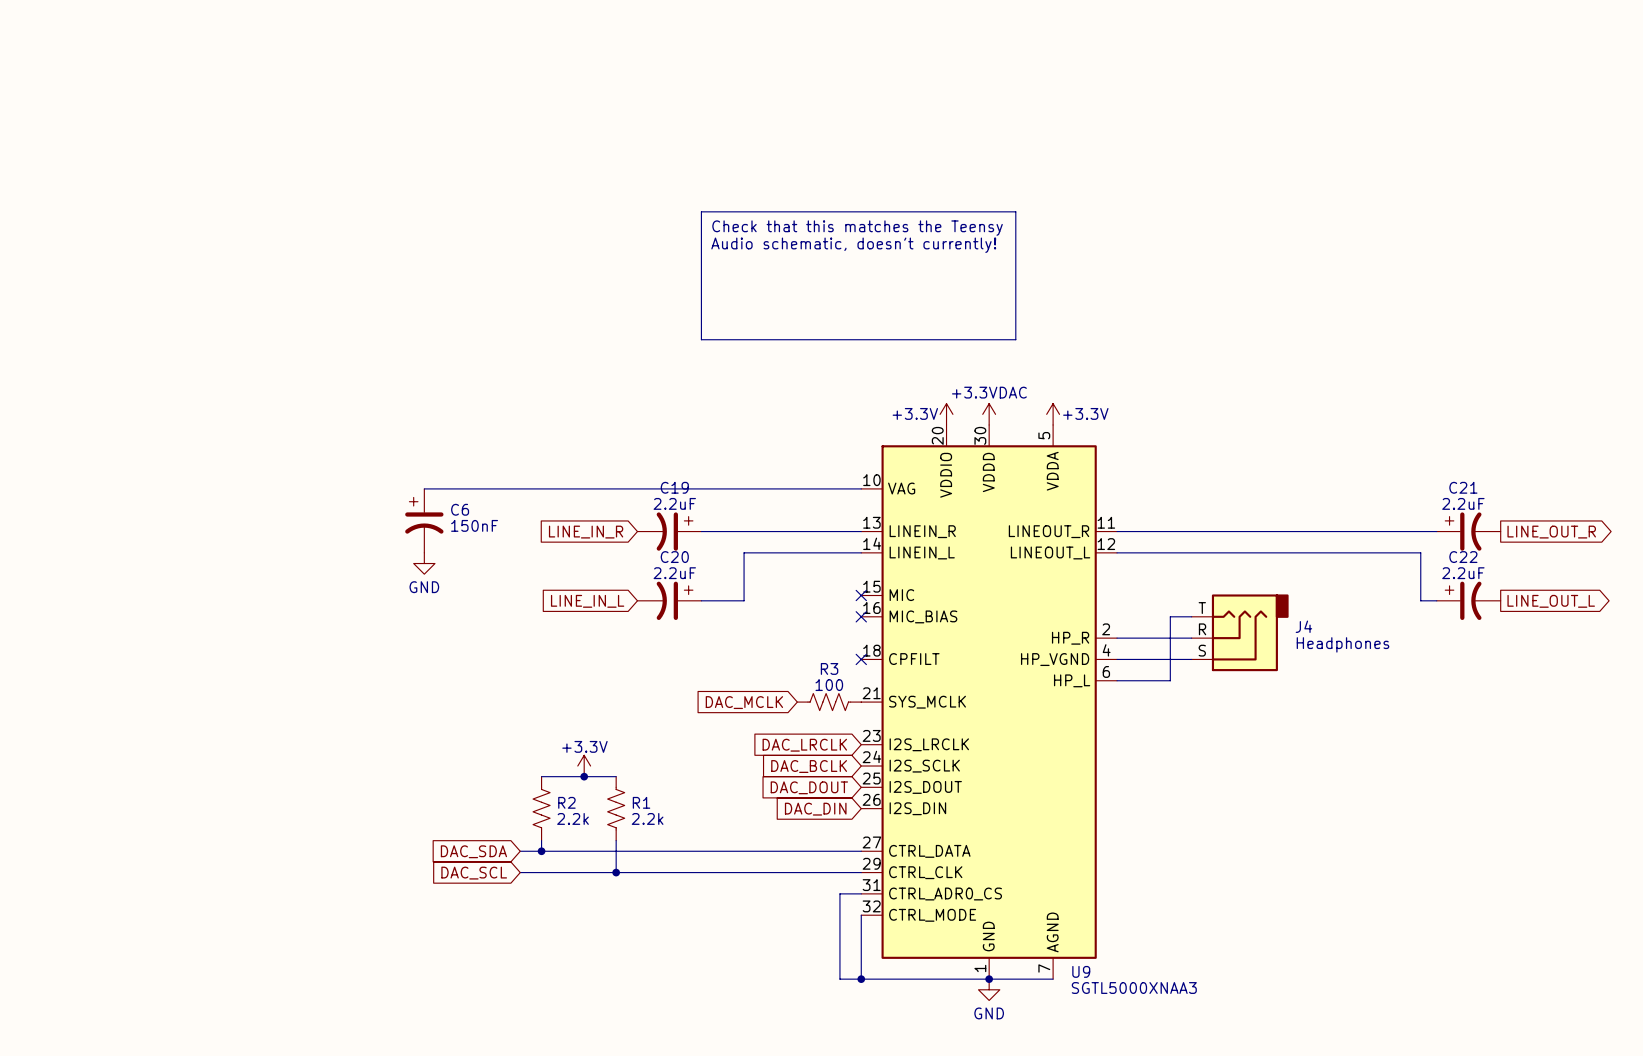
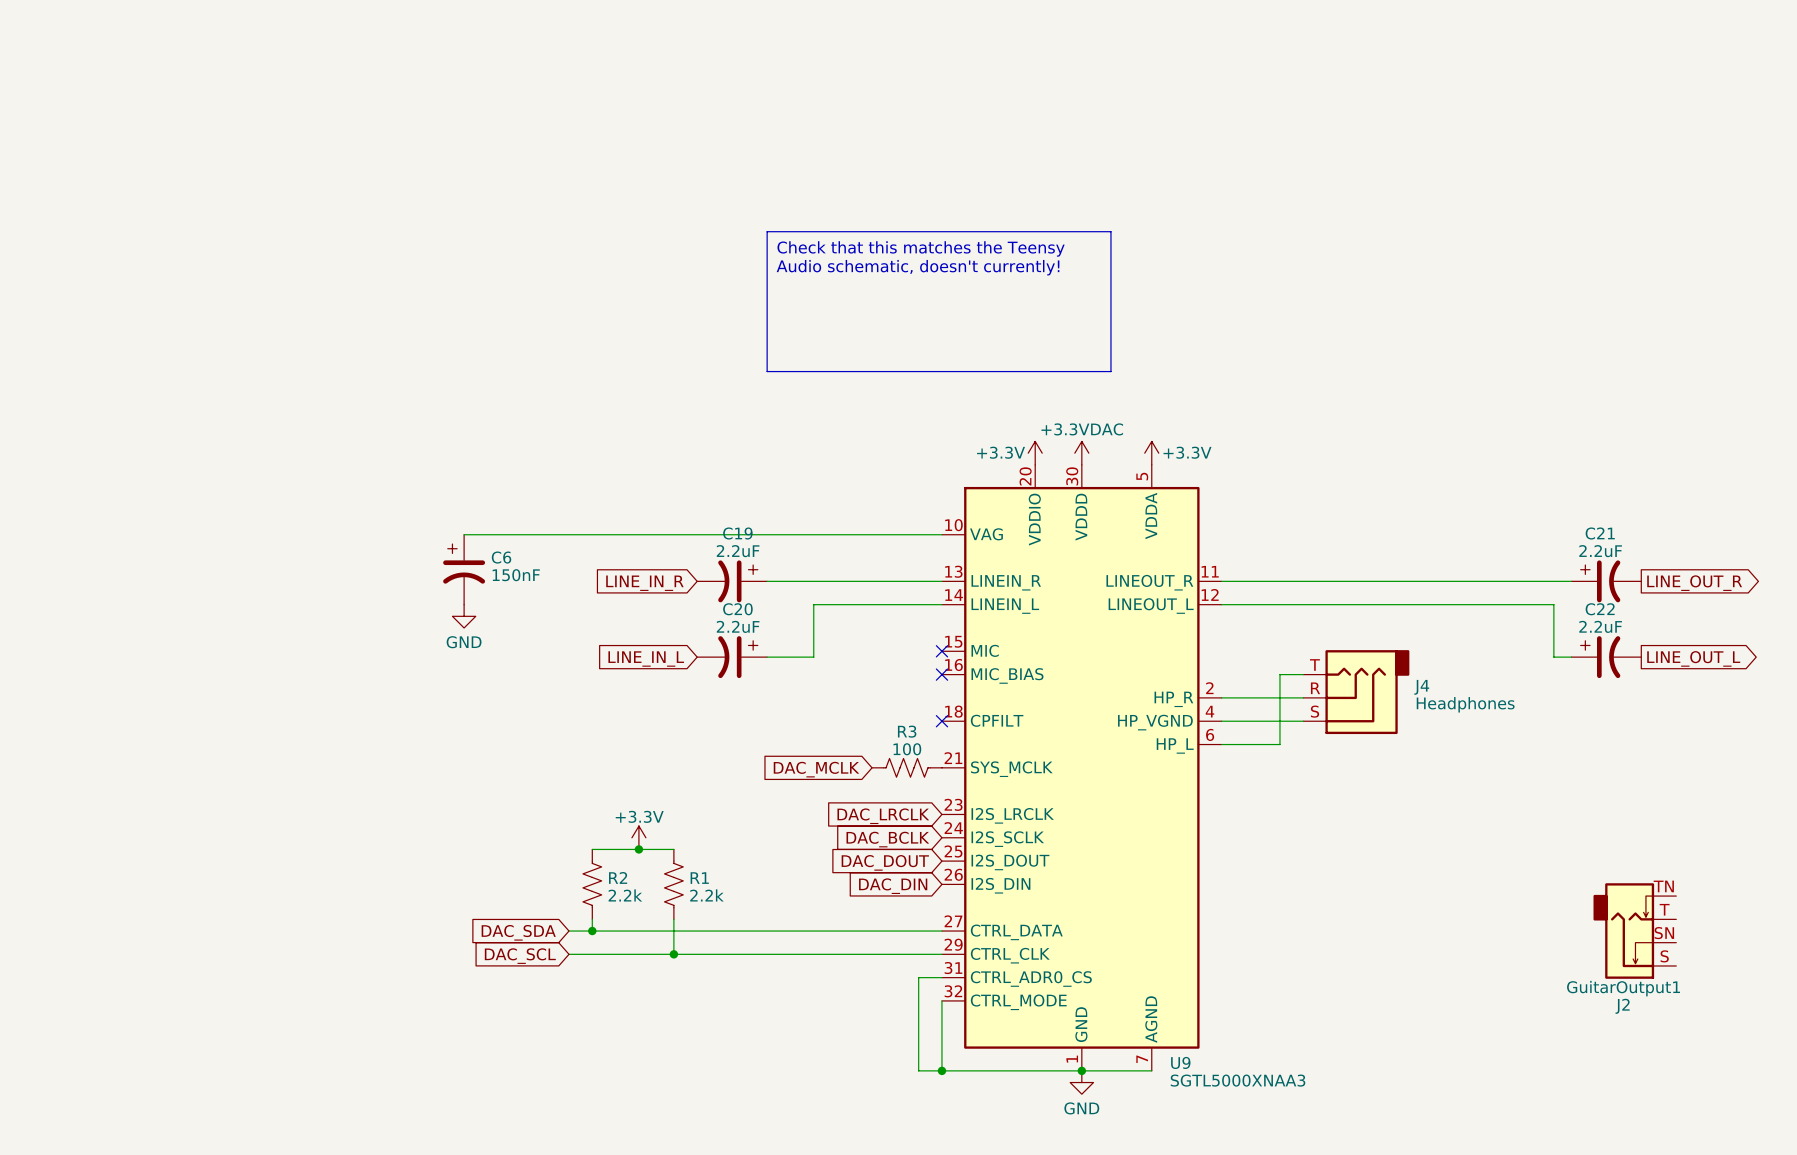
J2: none -> GuitarOutput1 (1634, 931)

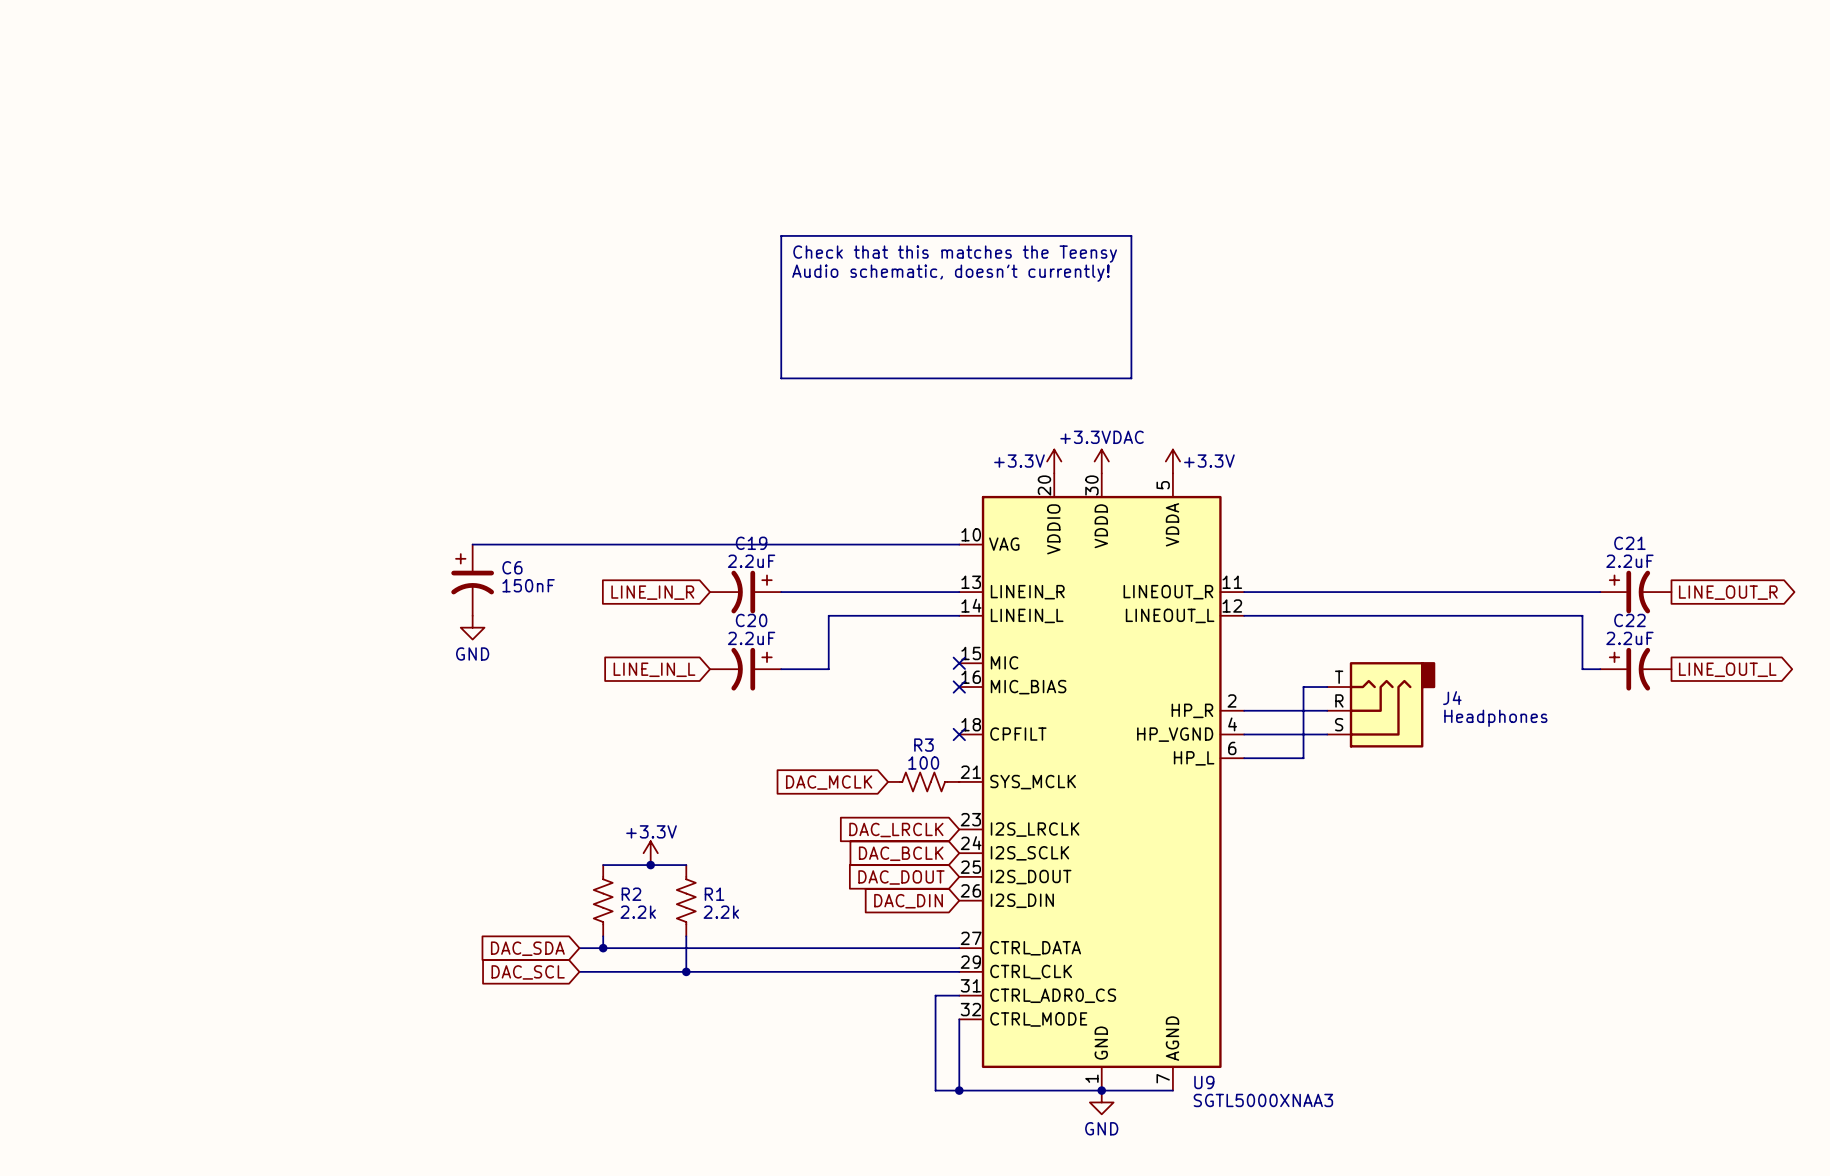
J2: GuitarOutput1 (1634, 931) -> none

